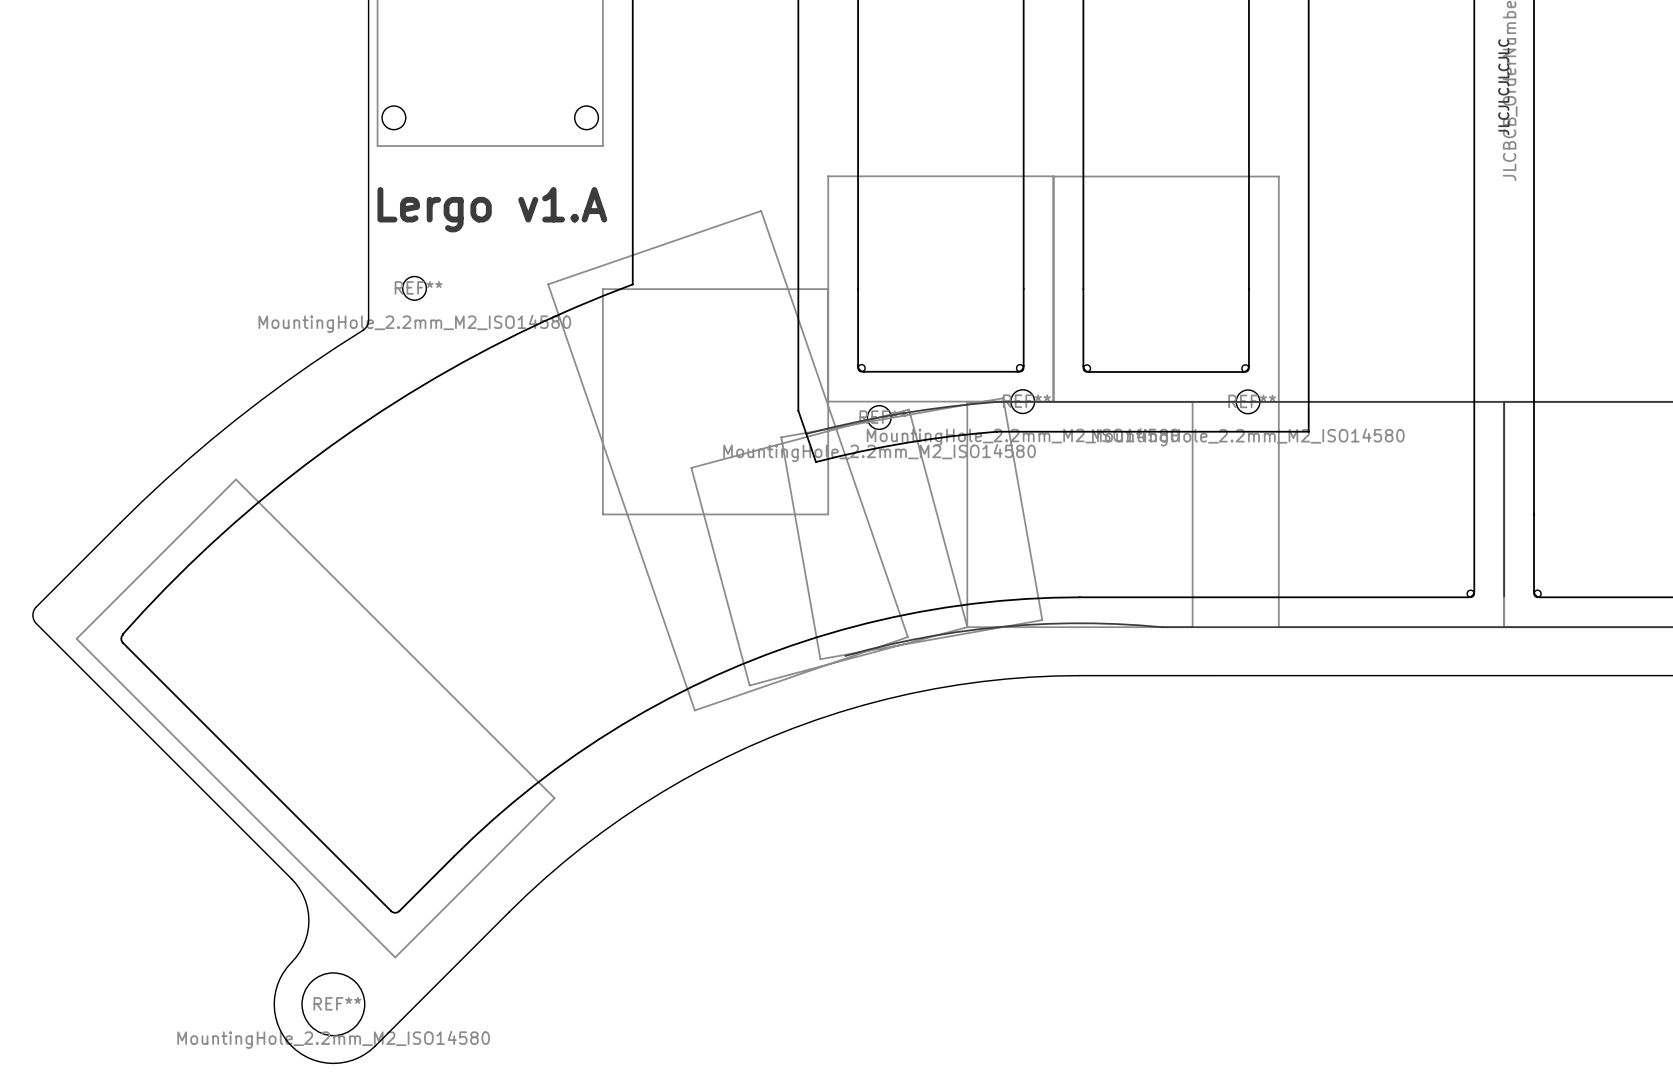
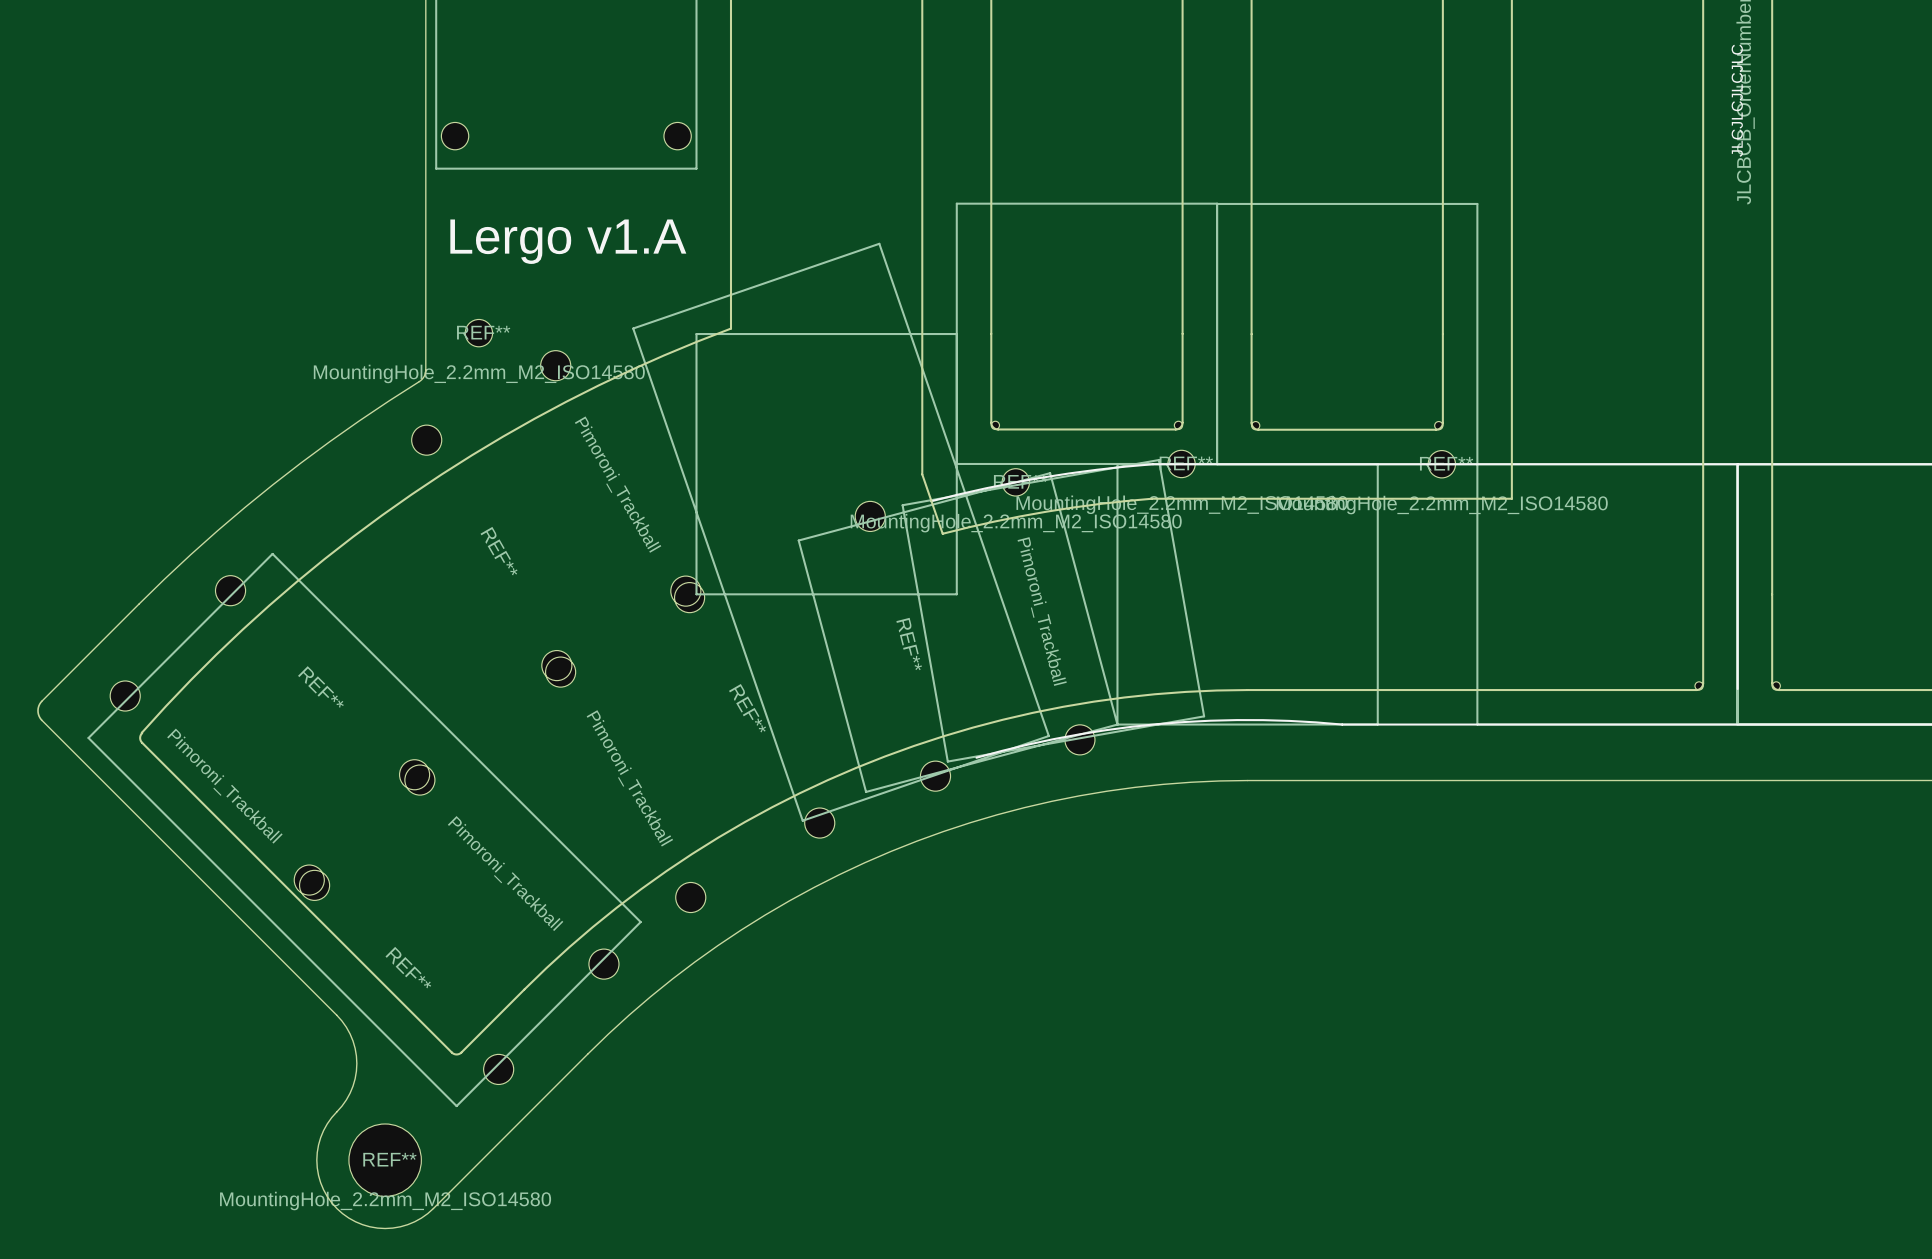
REF**: none -> Pimoroni_Trackball (558, 518)
REF**: none -> Pimoroni_Trackball (975, 632)
REF**: none -> Pimoroni_Trackball (272, 738)
REF**: none -> Pimoroni_Trackball (688, 744)
REF**: none -> Pimoroni_Trackball (456, 922)

